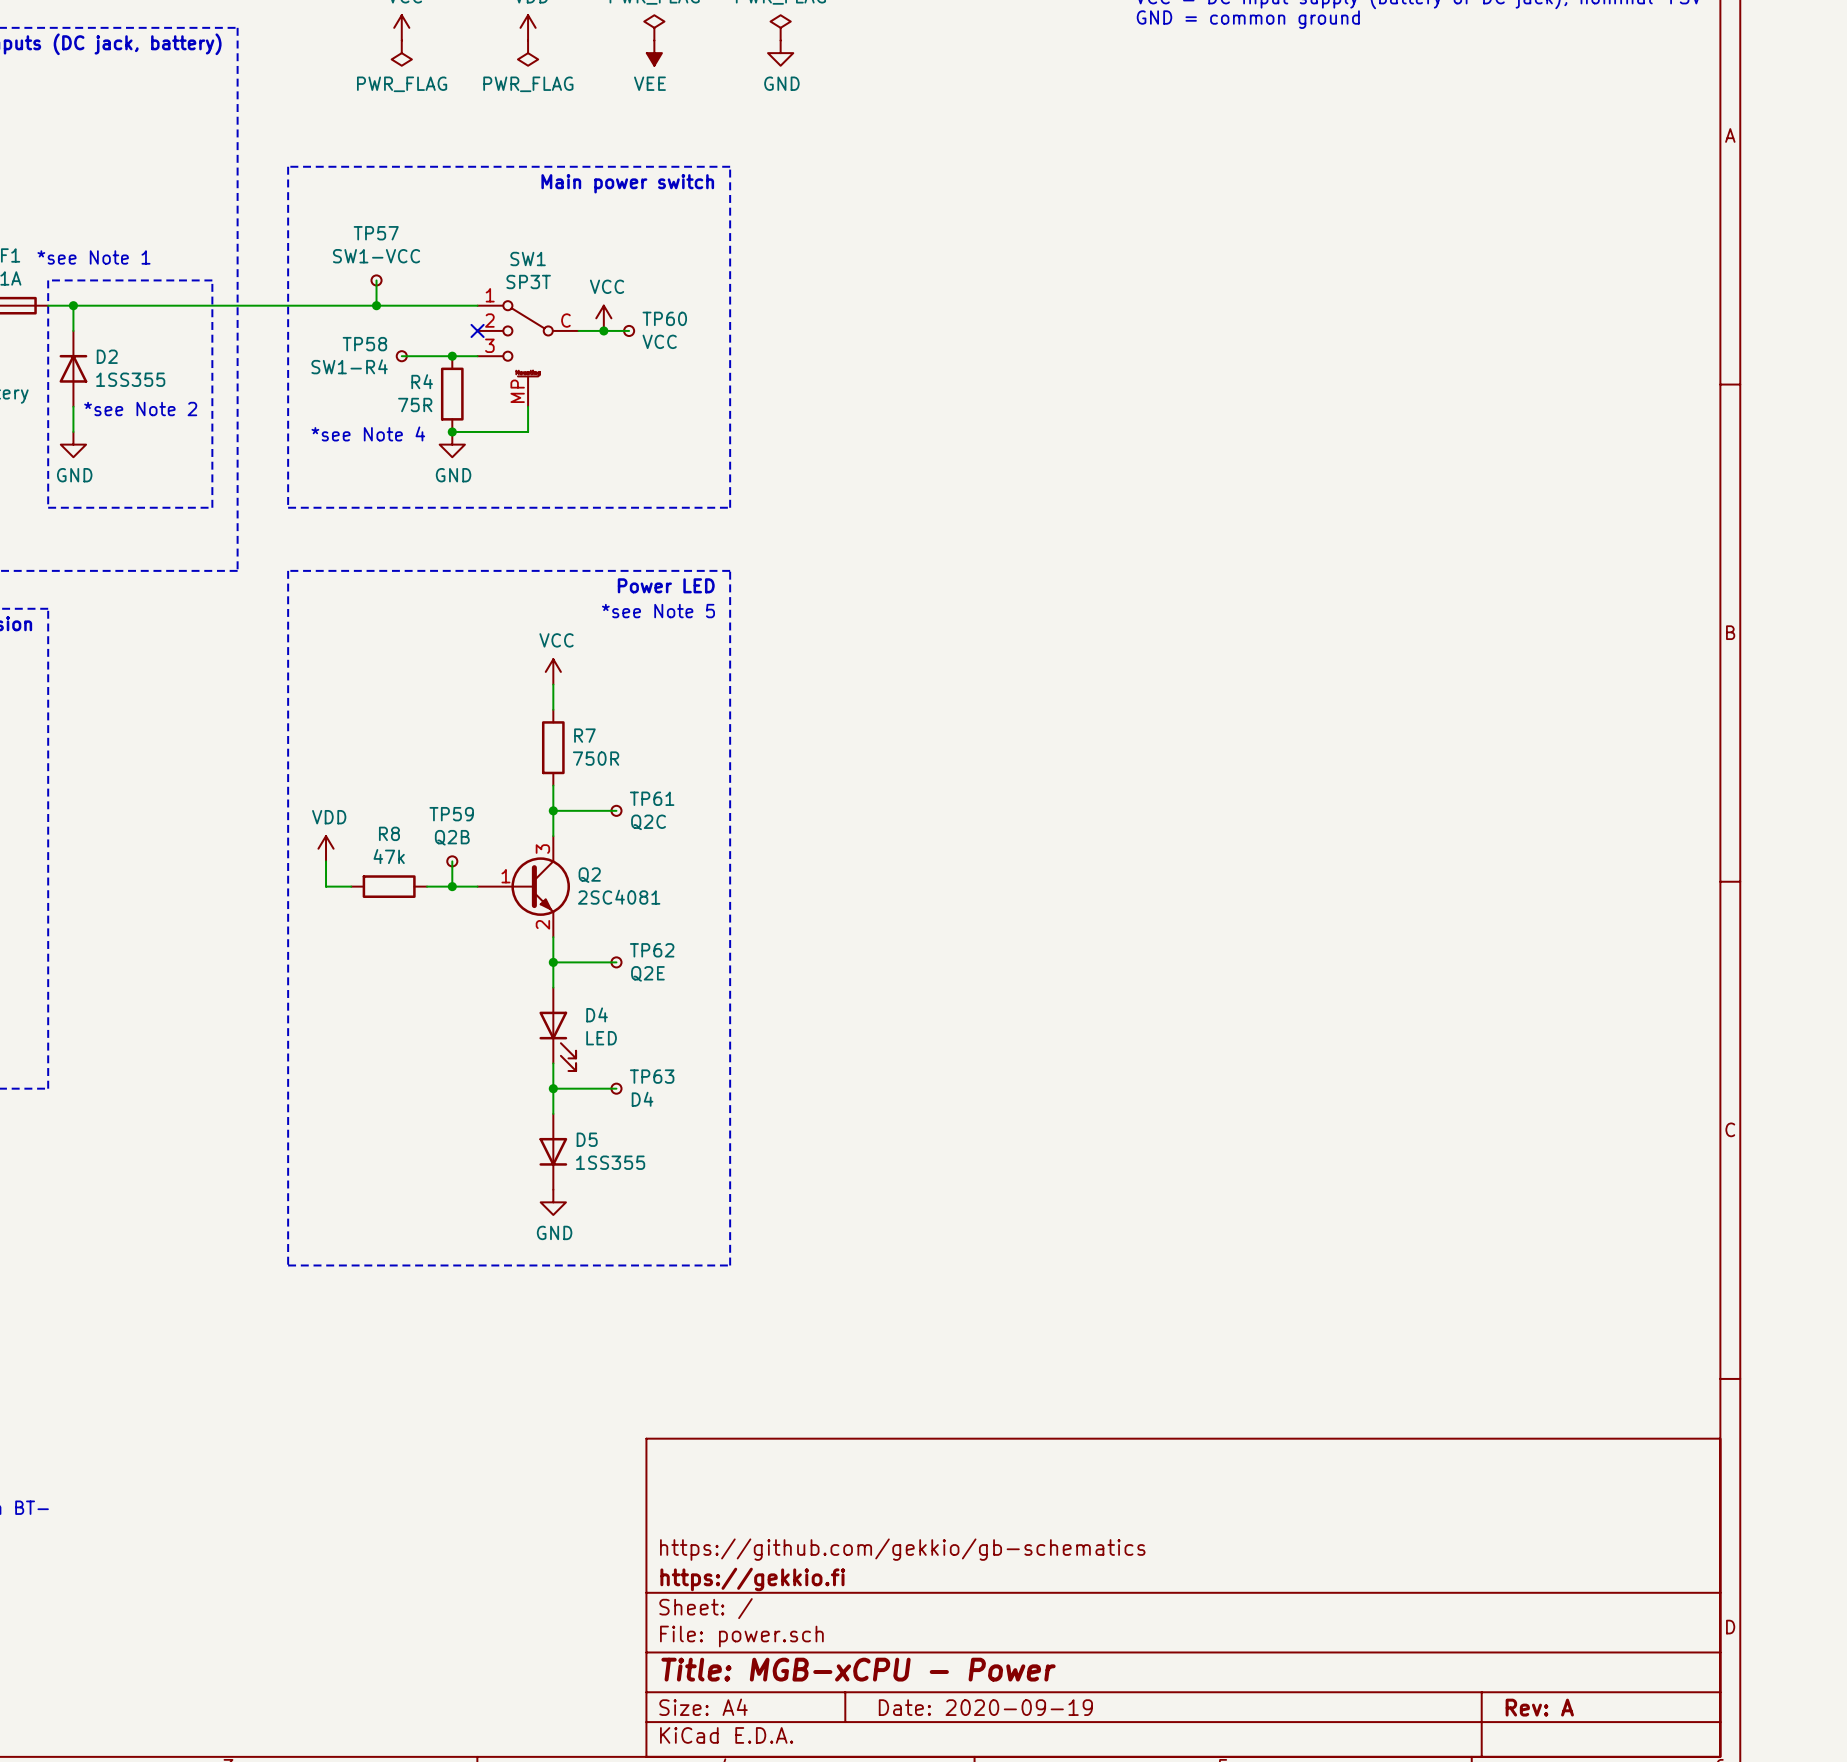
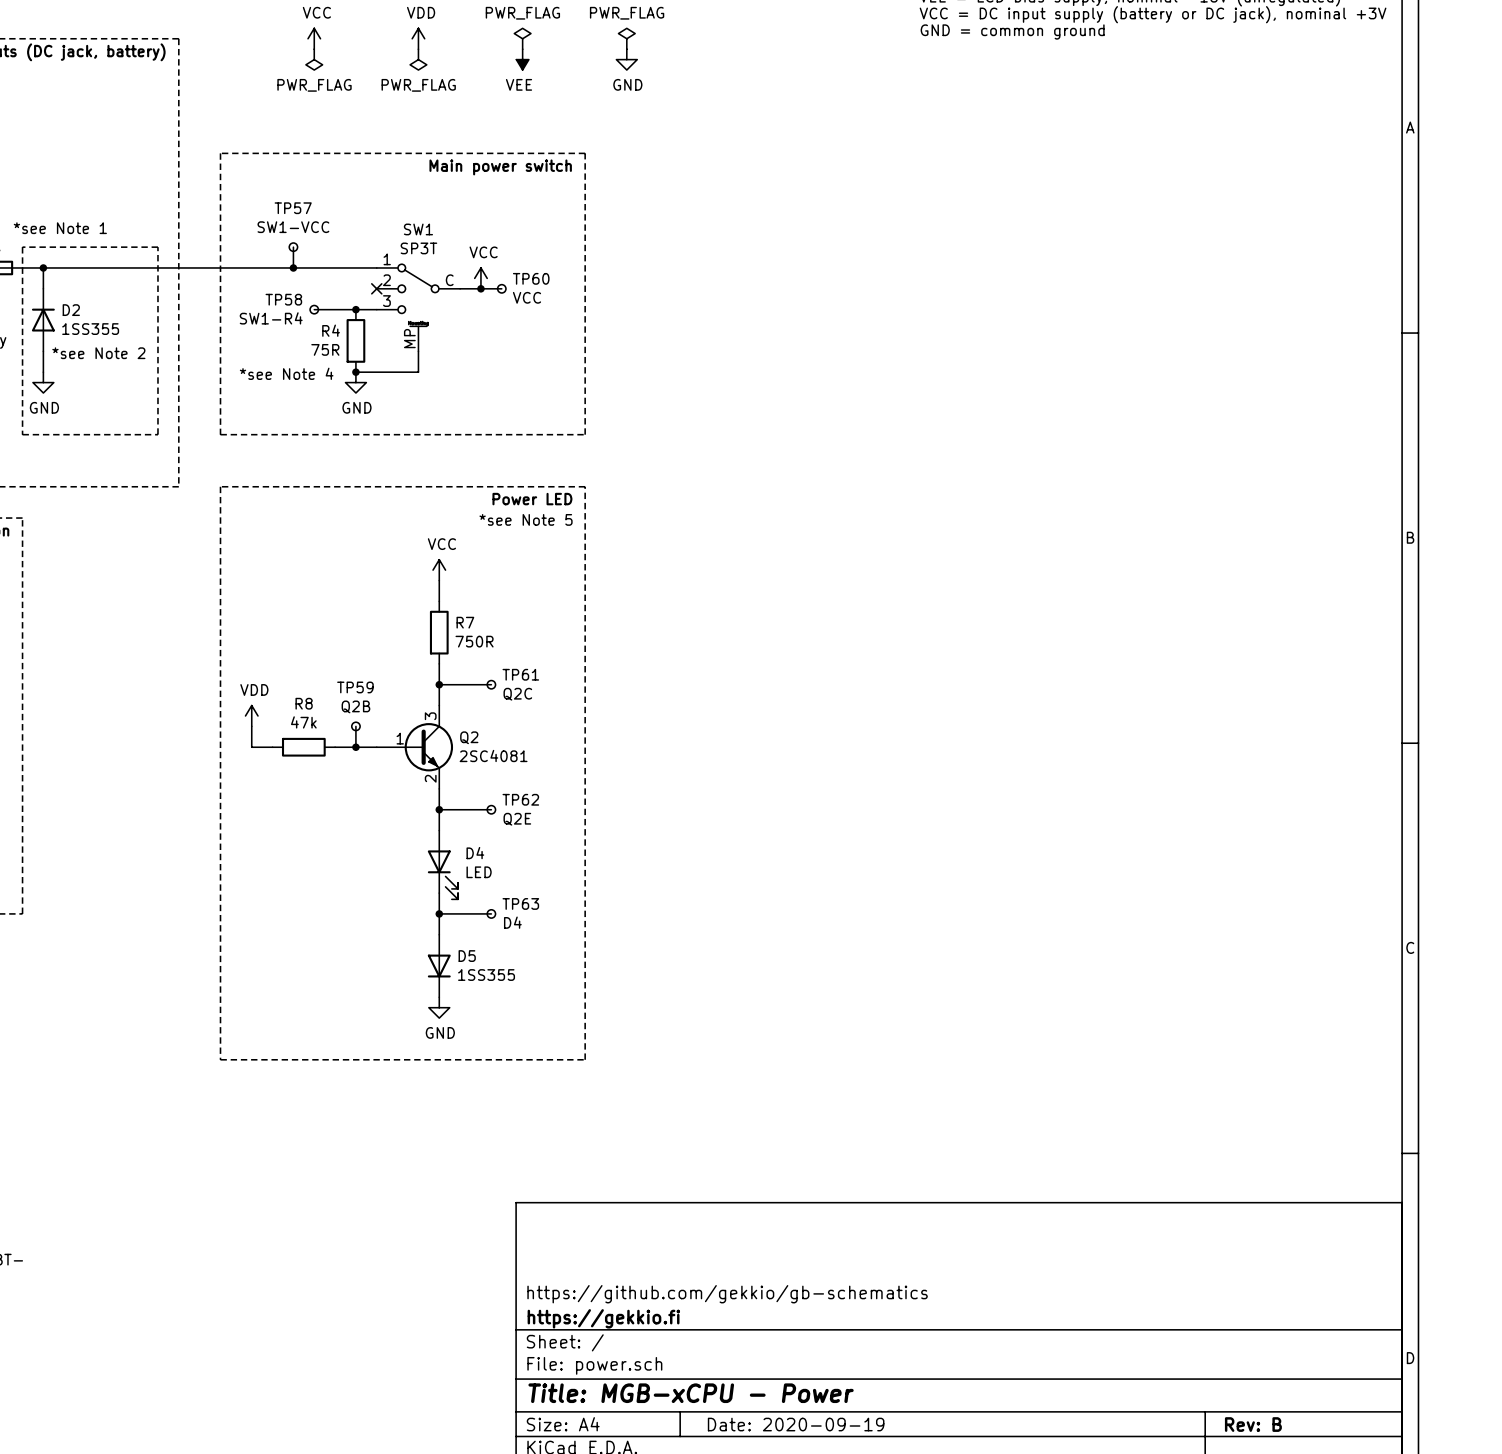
title block: Rev: A (1539, 1707) -> Rev: B (1253, 1424)

